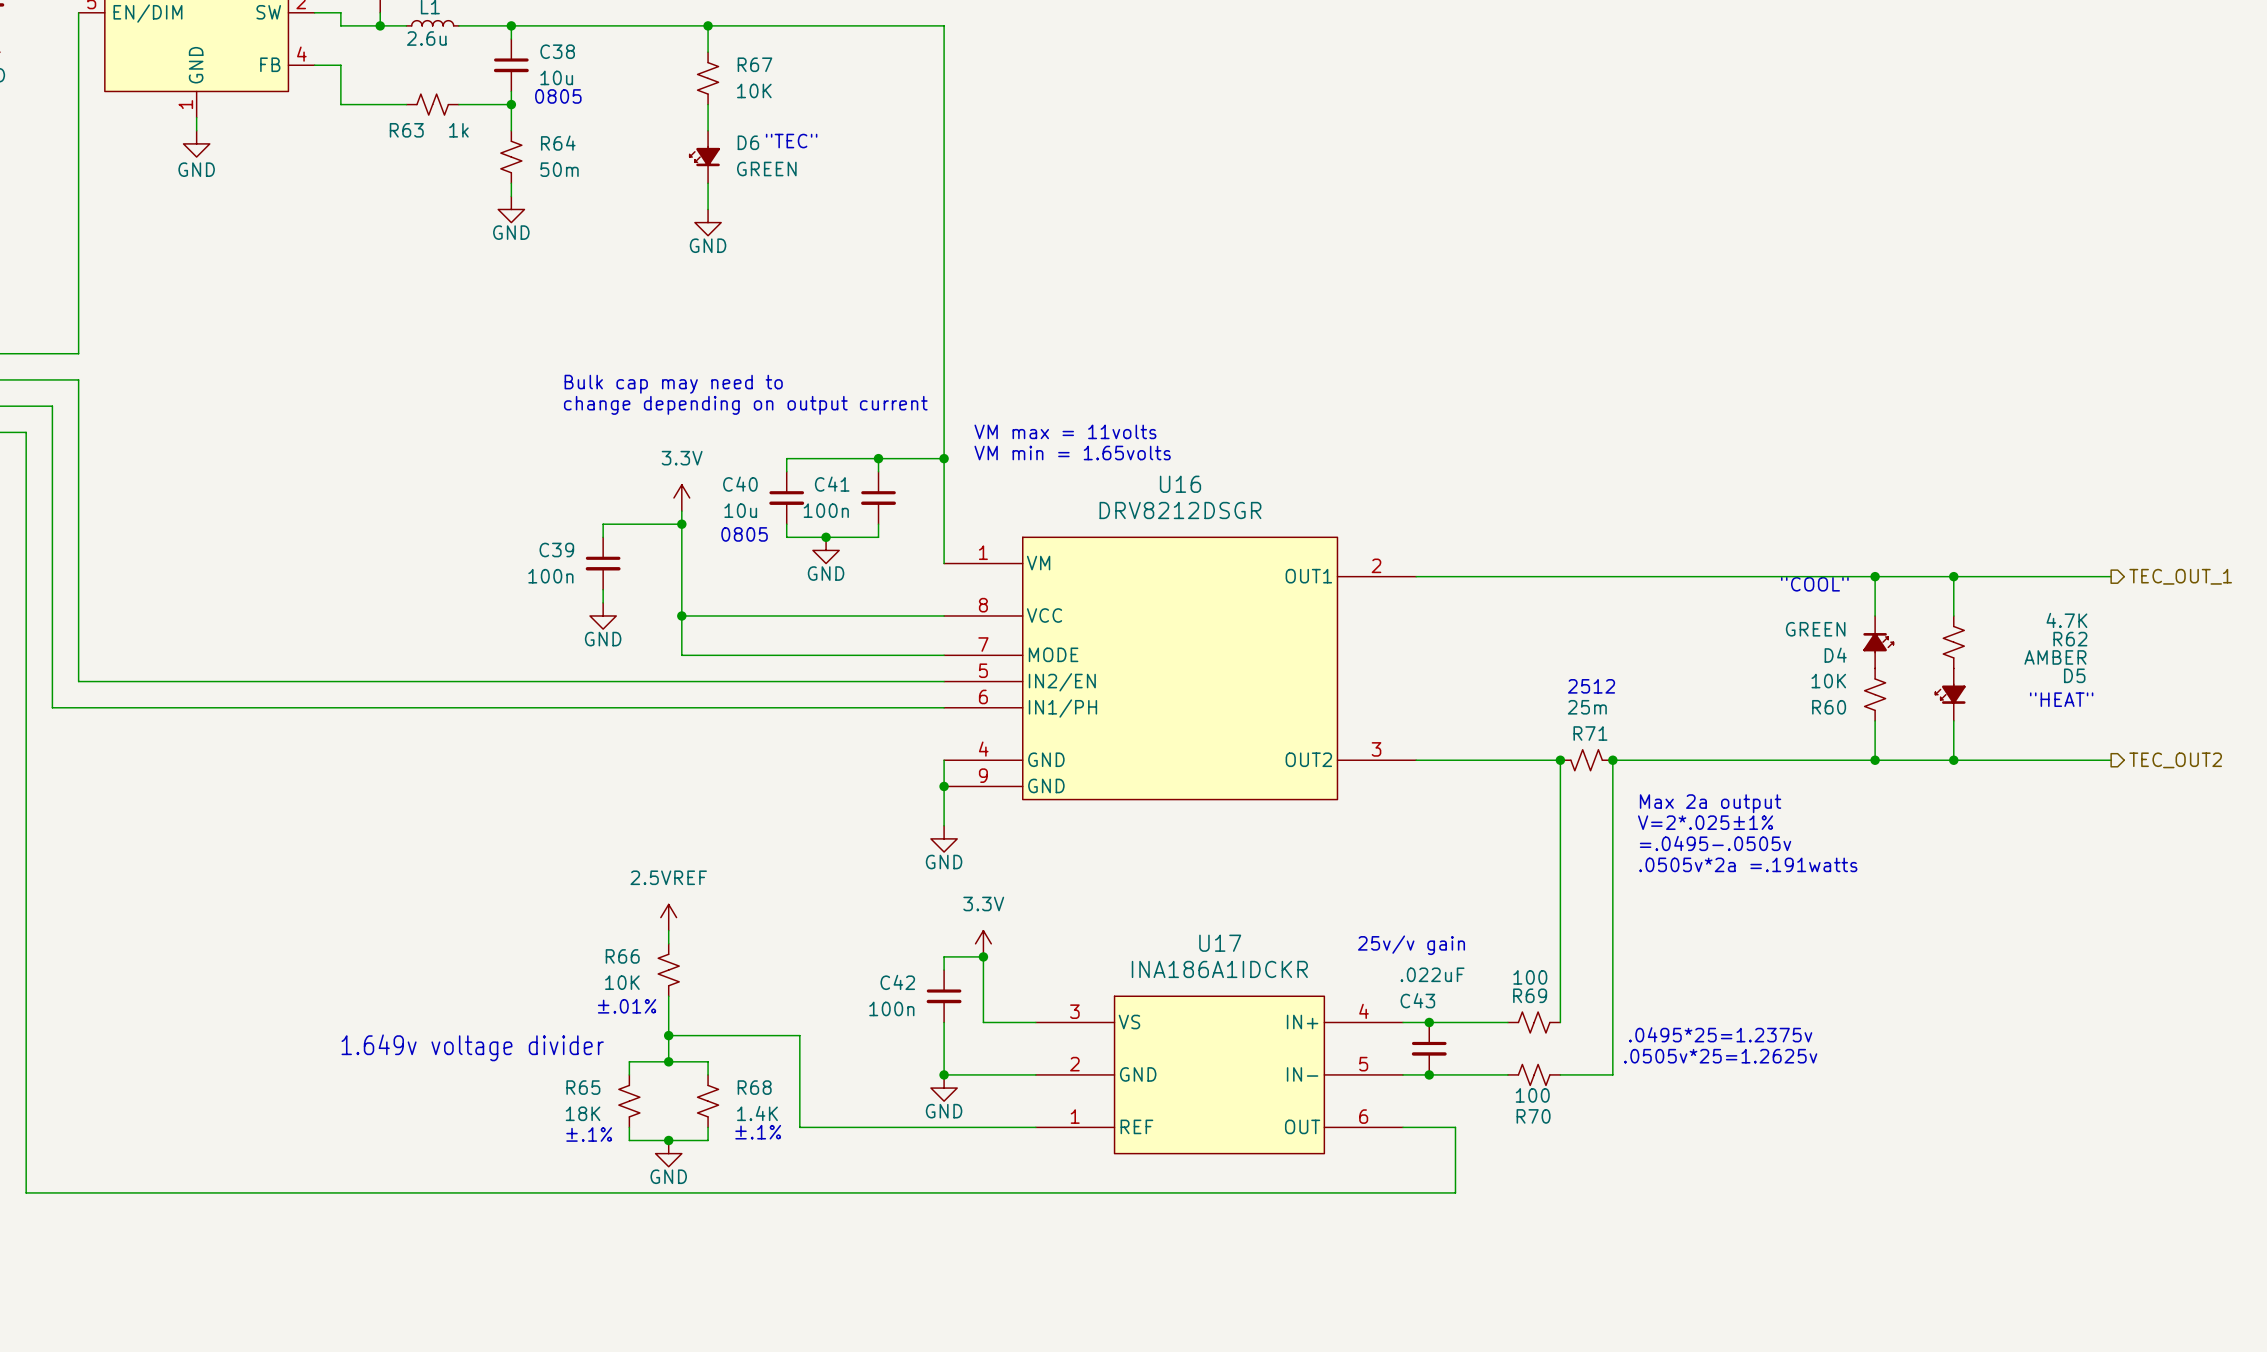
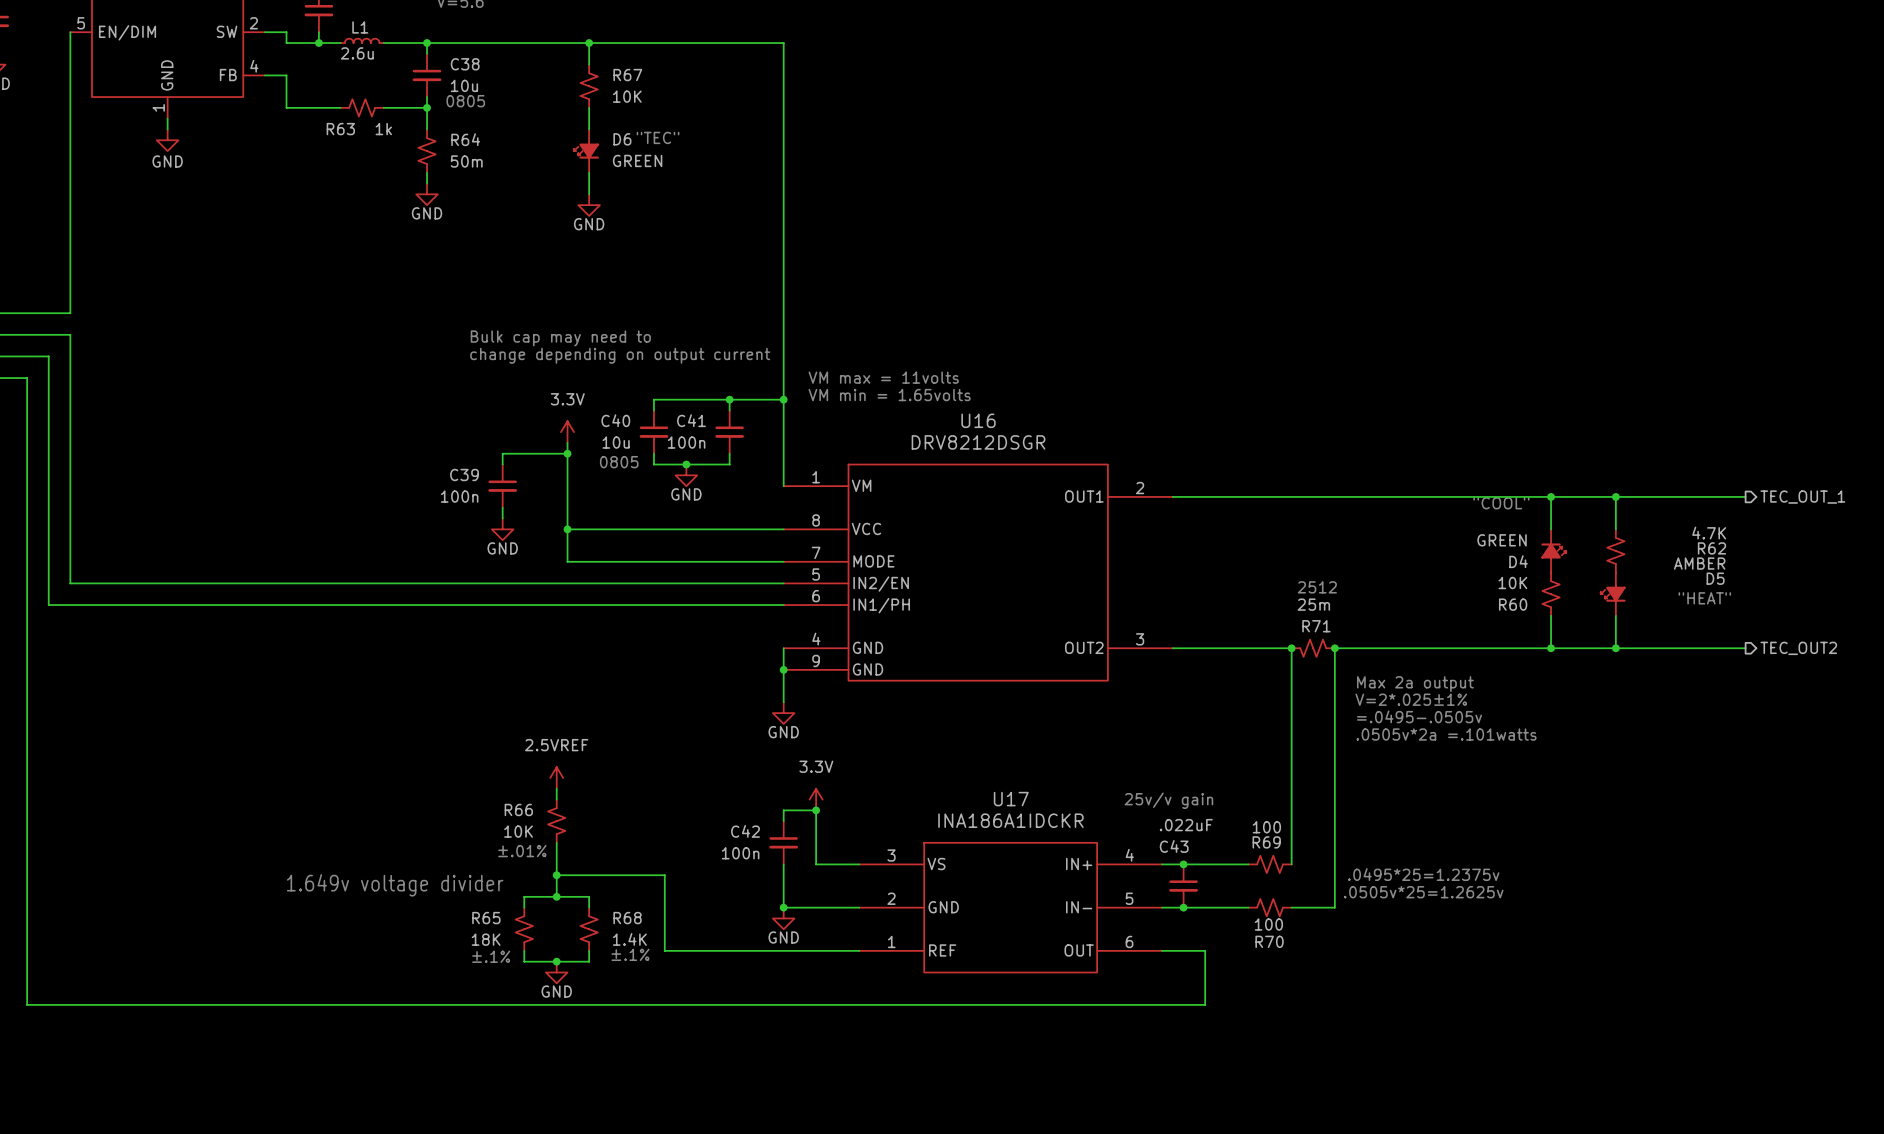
text: .0505v*2a =.191watts (1748, 864) -> .0505v*2a =.101watts (1446, 734)

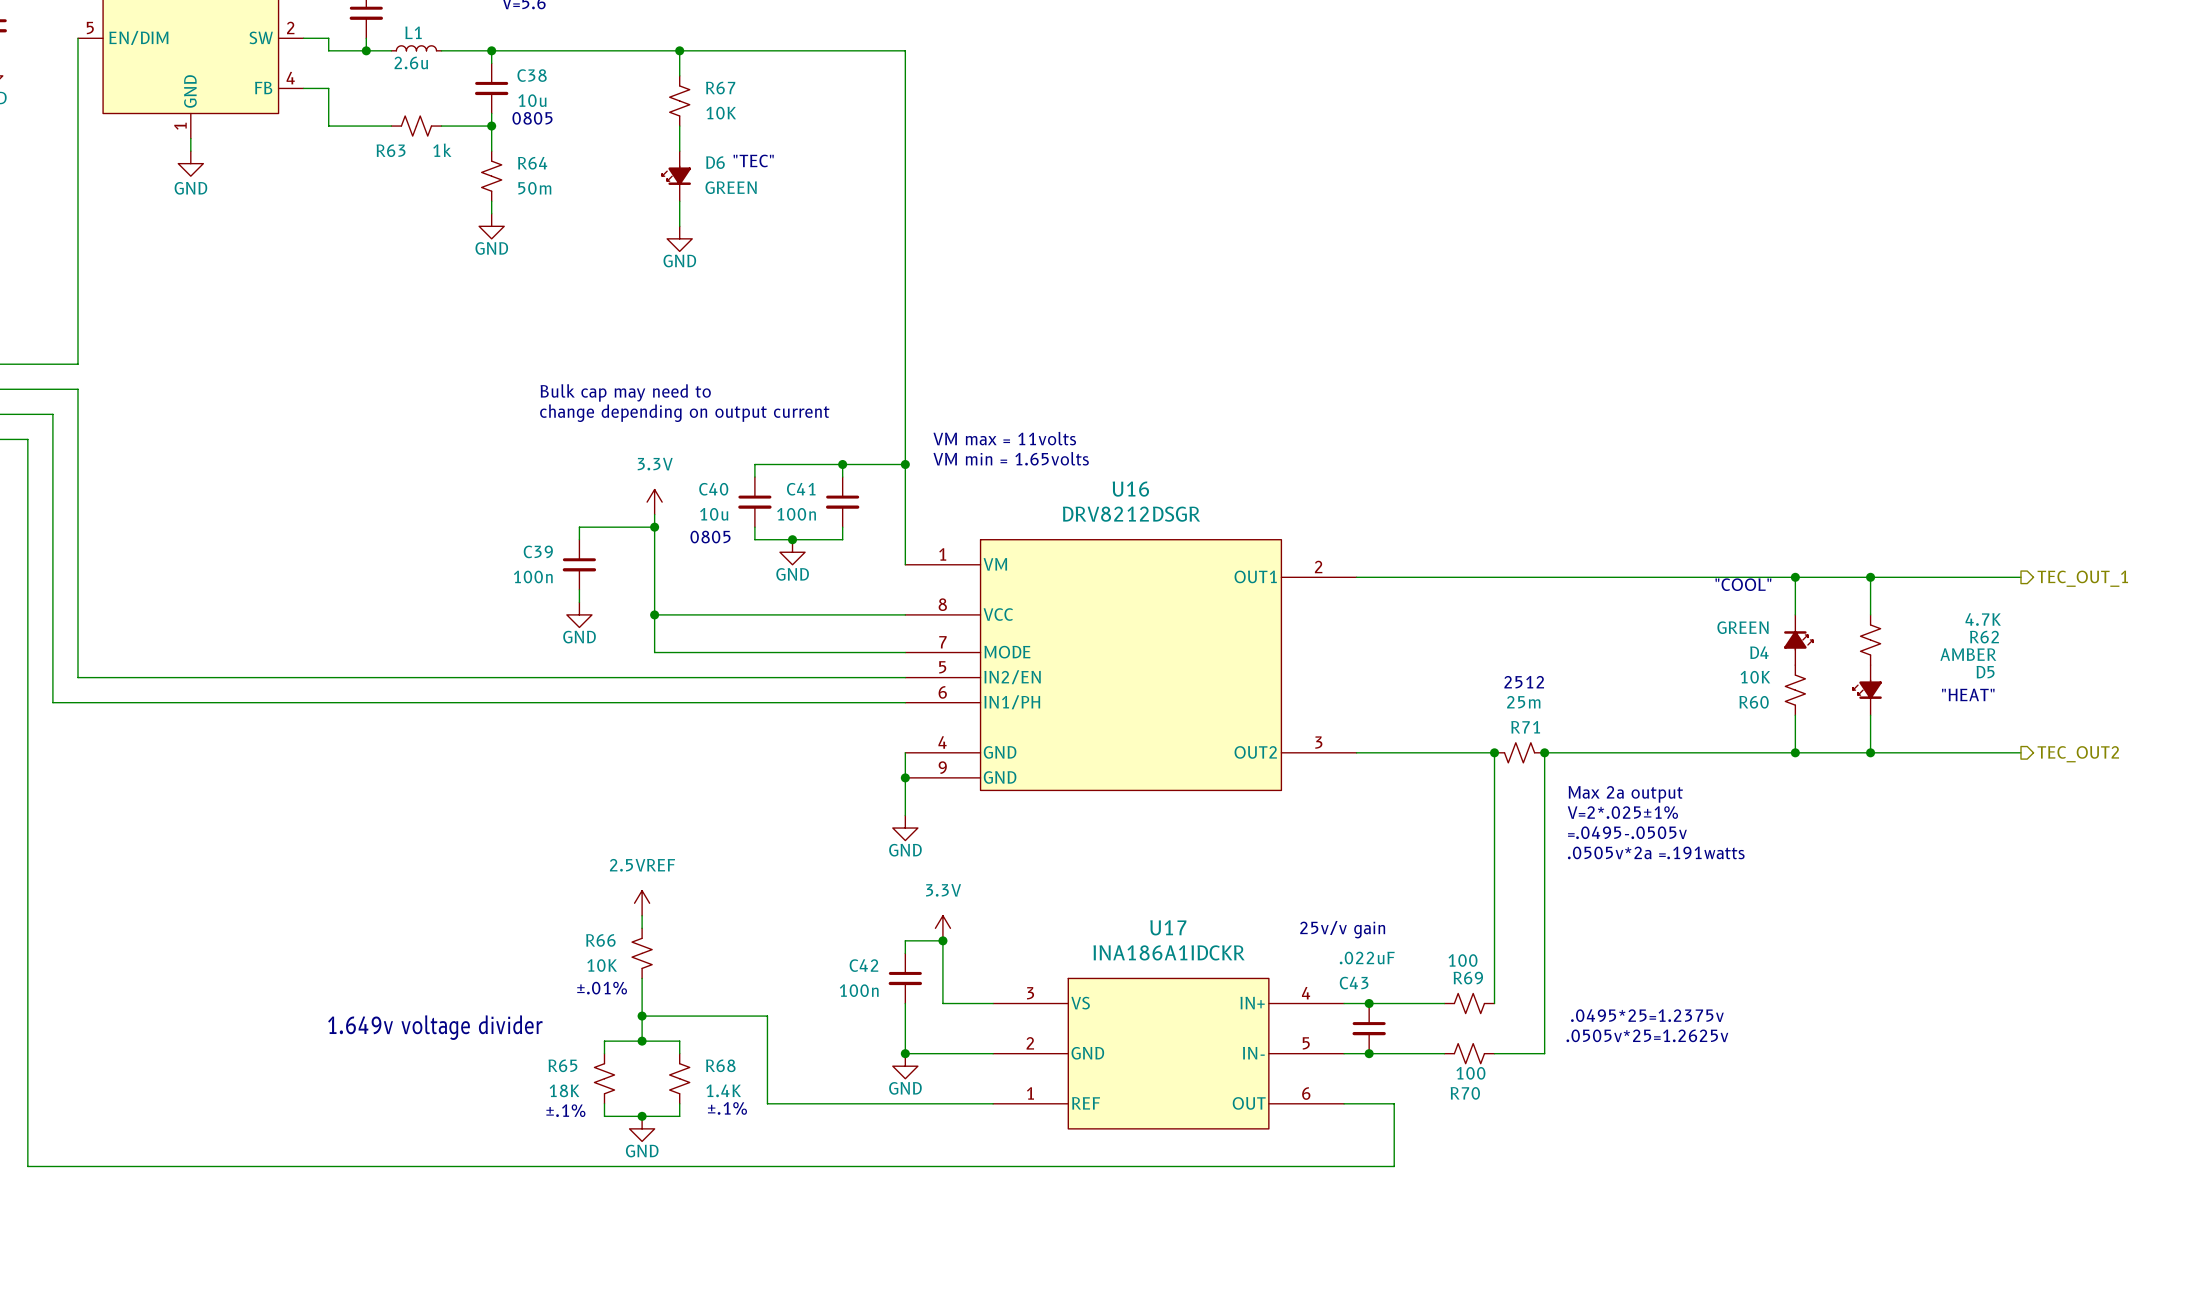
text: .0505v*2a =.101watts (1446, 734) -> .0505v*2a =.191watts (1656, 852)

